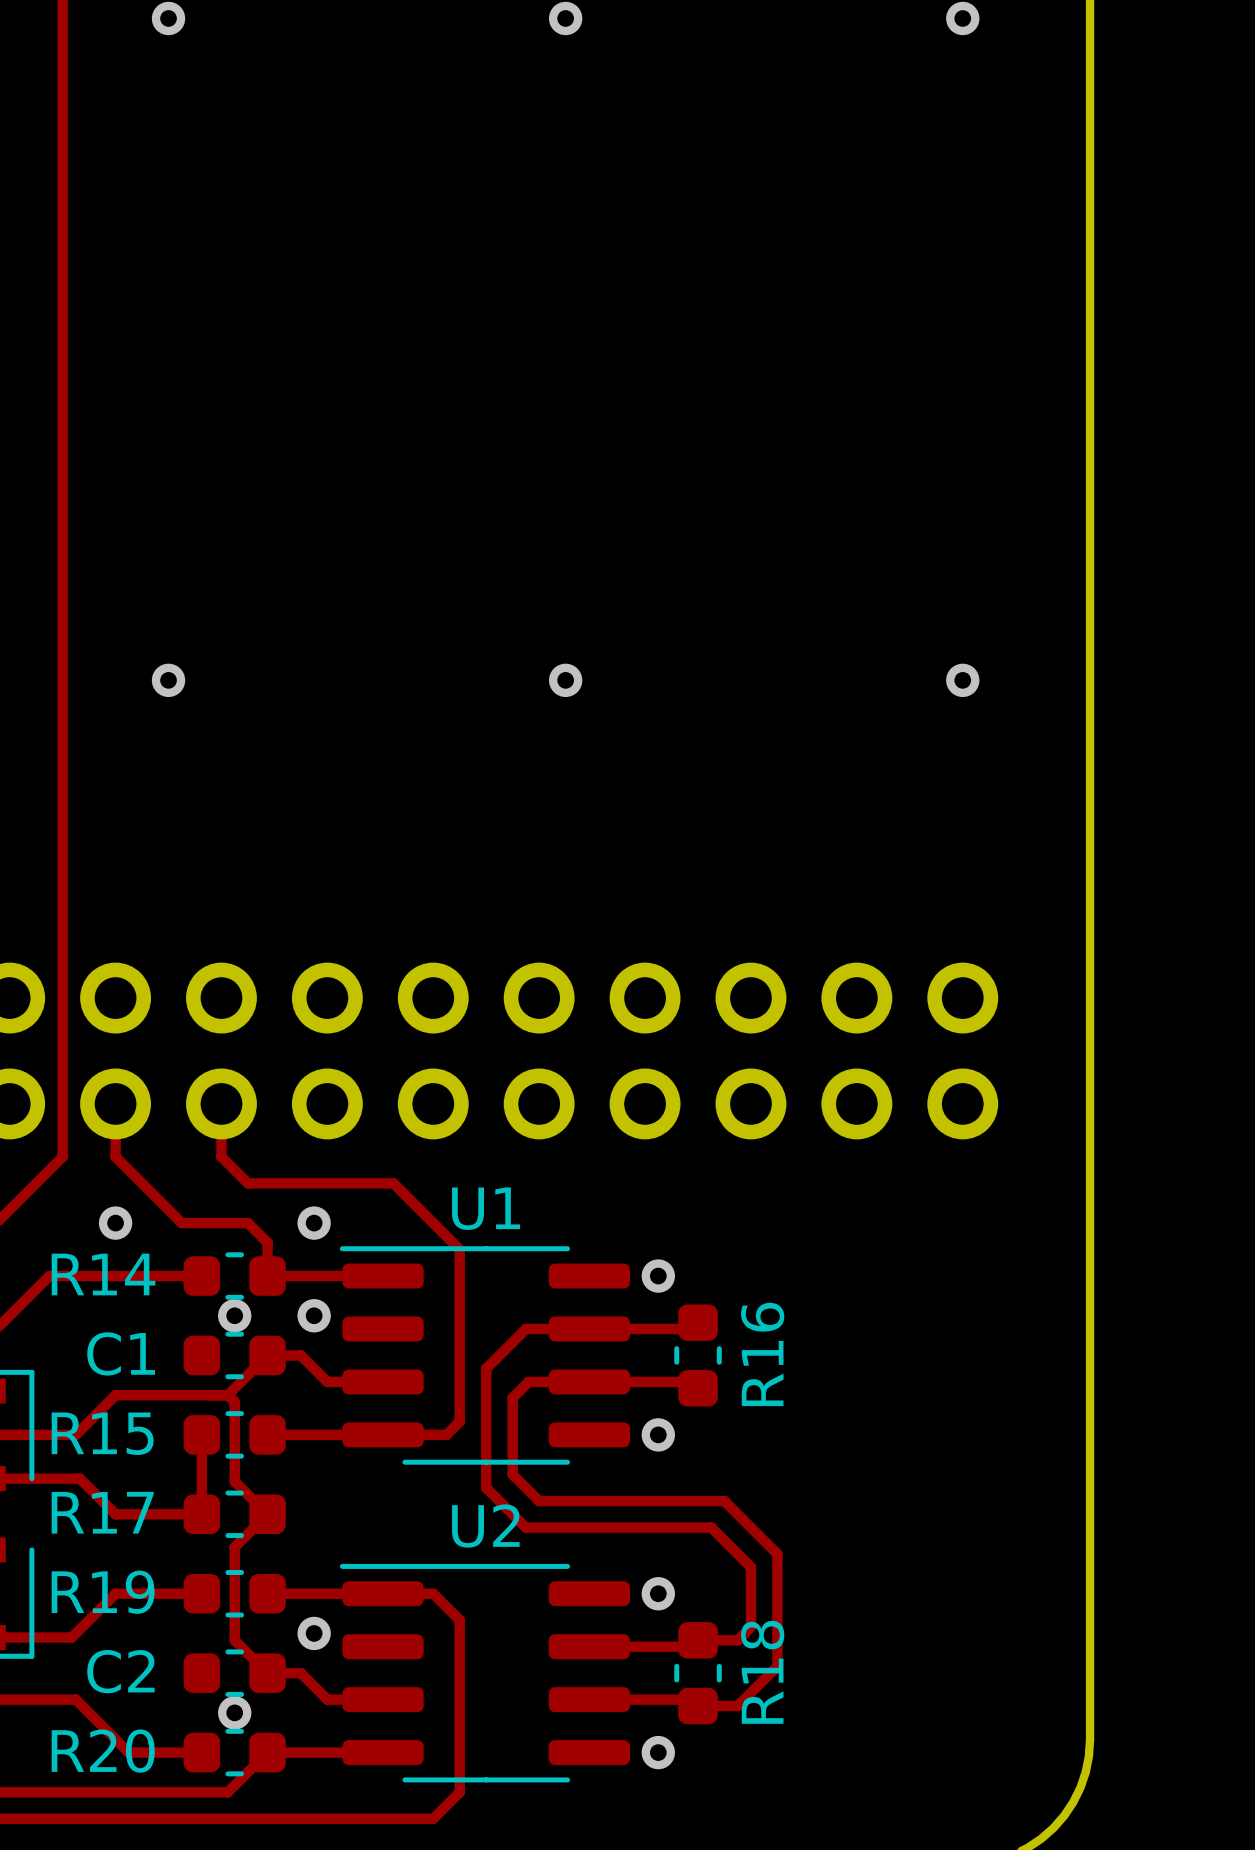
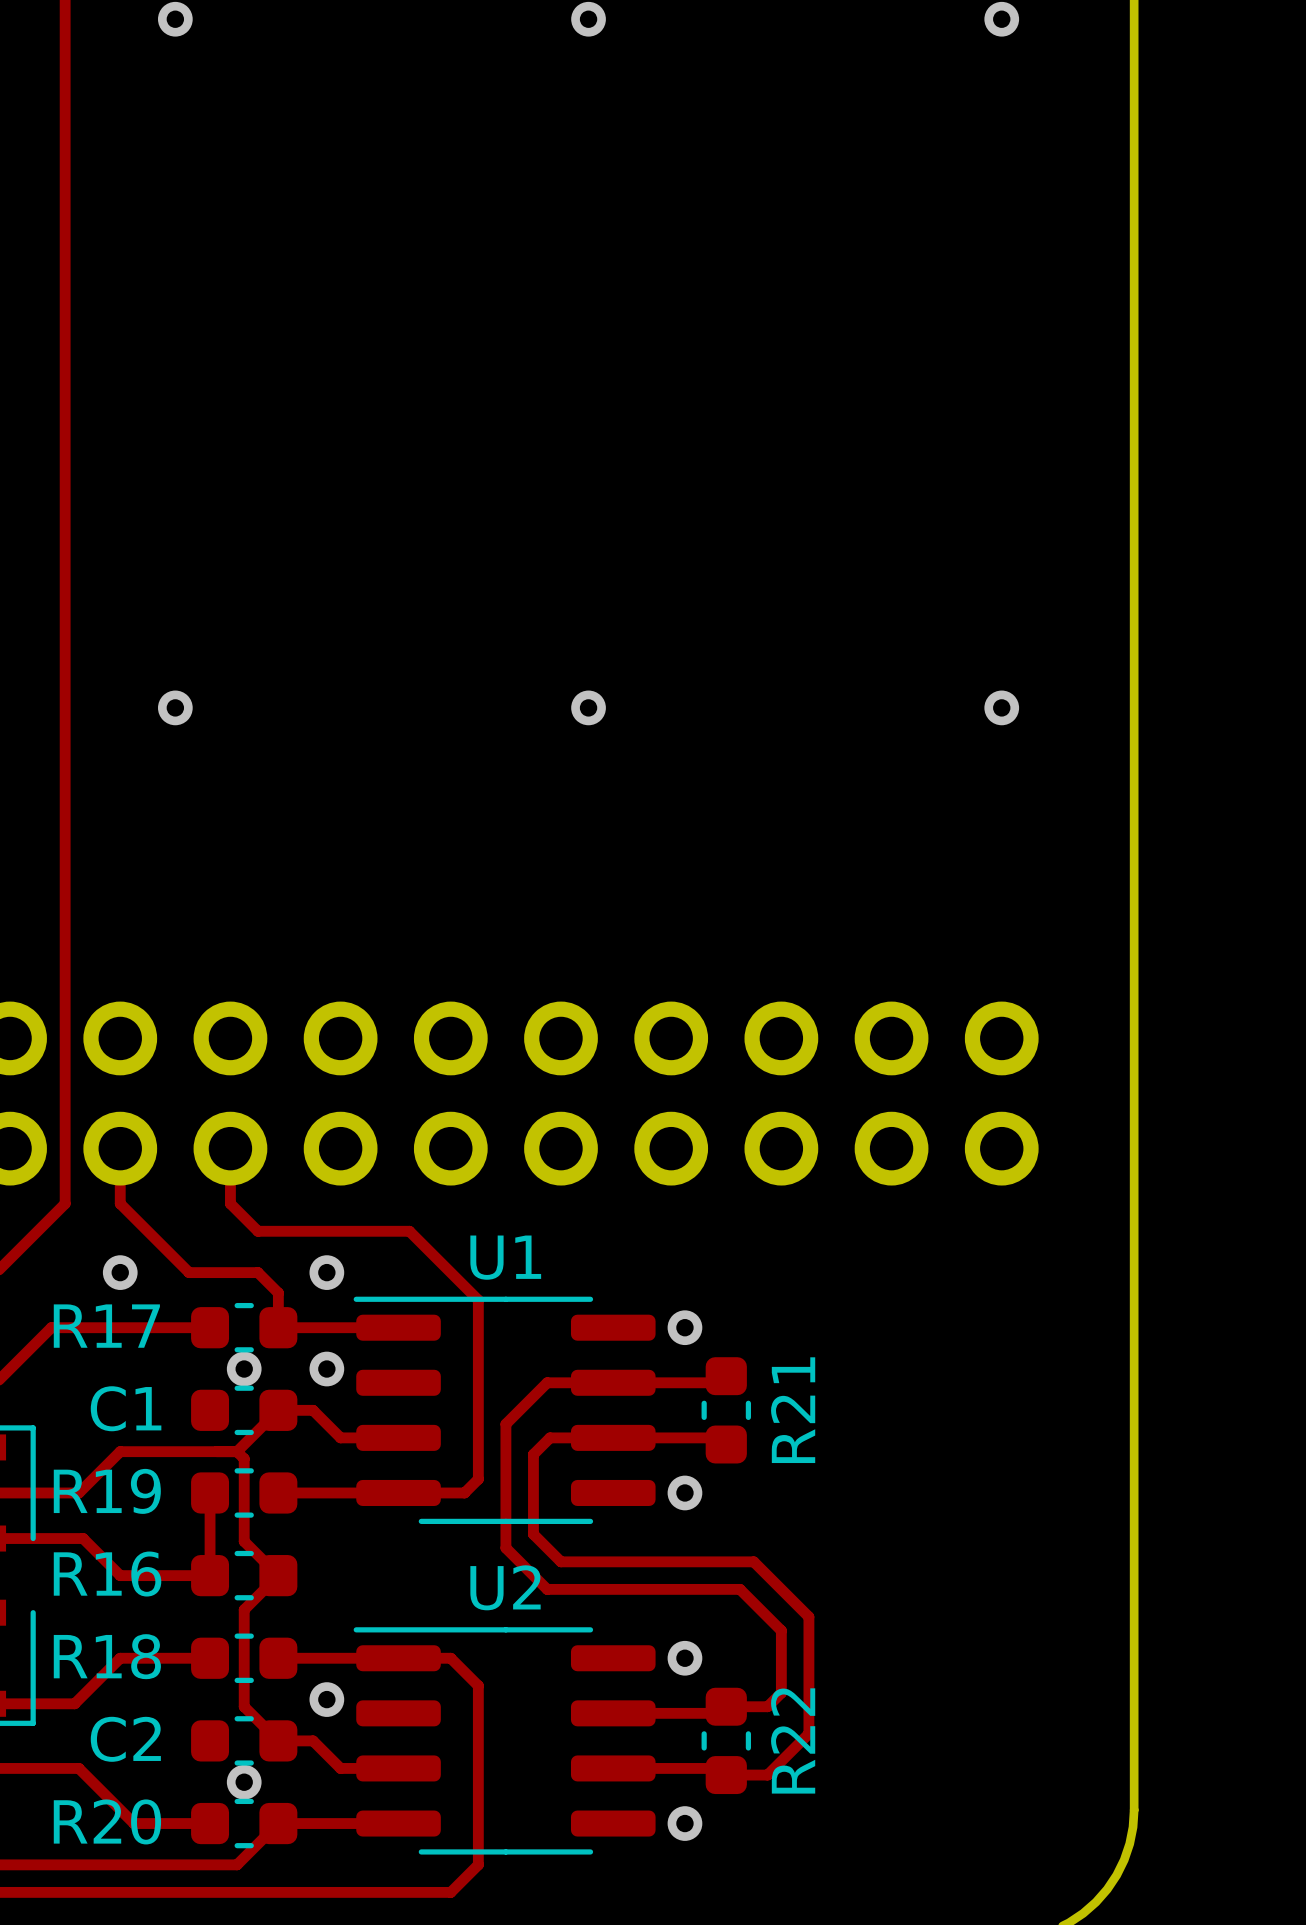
R14 name: R14 (103, 1274) -> R17 (106, 1326)
R16 name: R16 (762, 1354) -> R21 (793, 1410)
R15 name: R15 (102, 1433) -> R19 (107, 1491)
R17 name: R17 (102, 1512) -> R16 (107, 1574)
R19 name: R19 (103, 1592) -> R18 (107, 1656)
R18 name: R18 (762, 1672) -> R22 (793, 1740)

